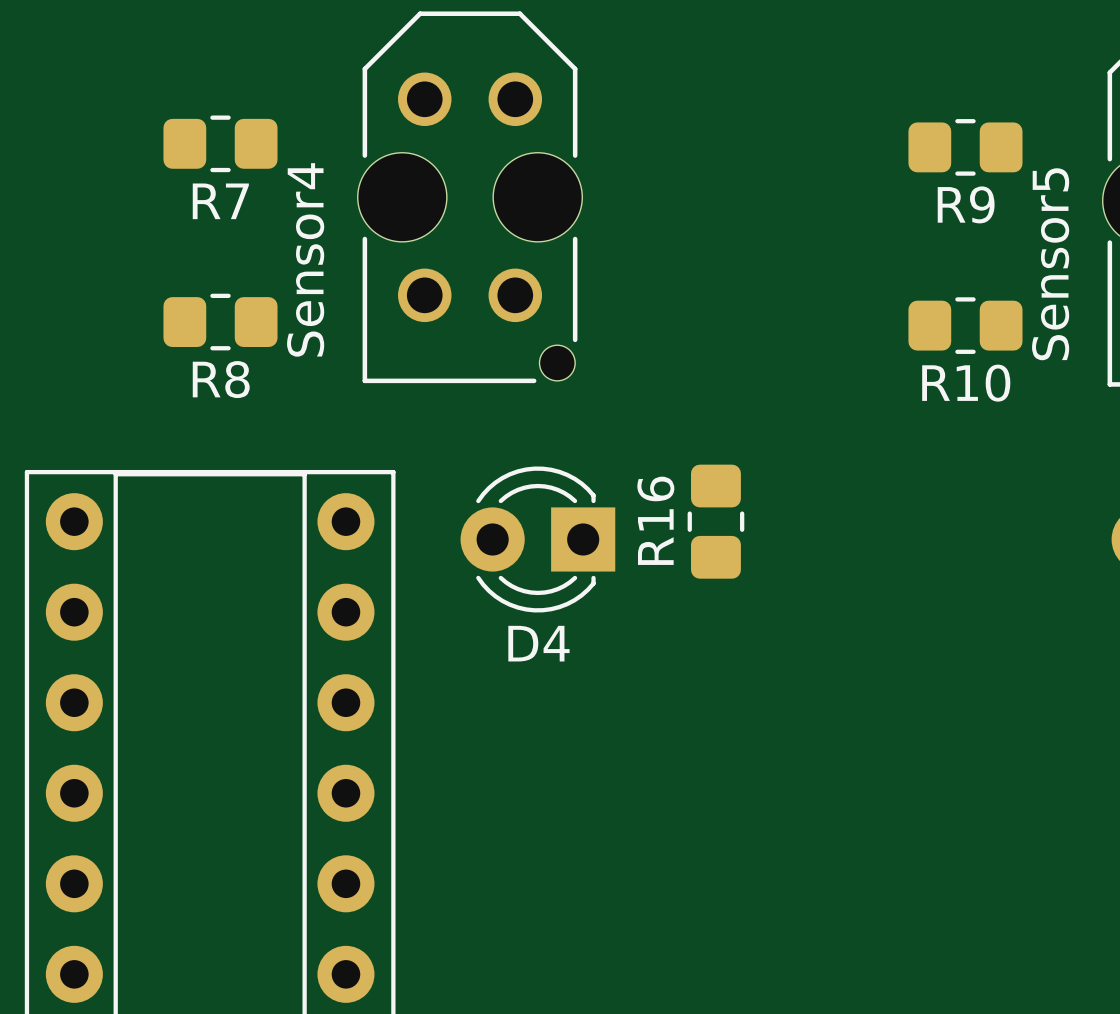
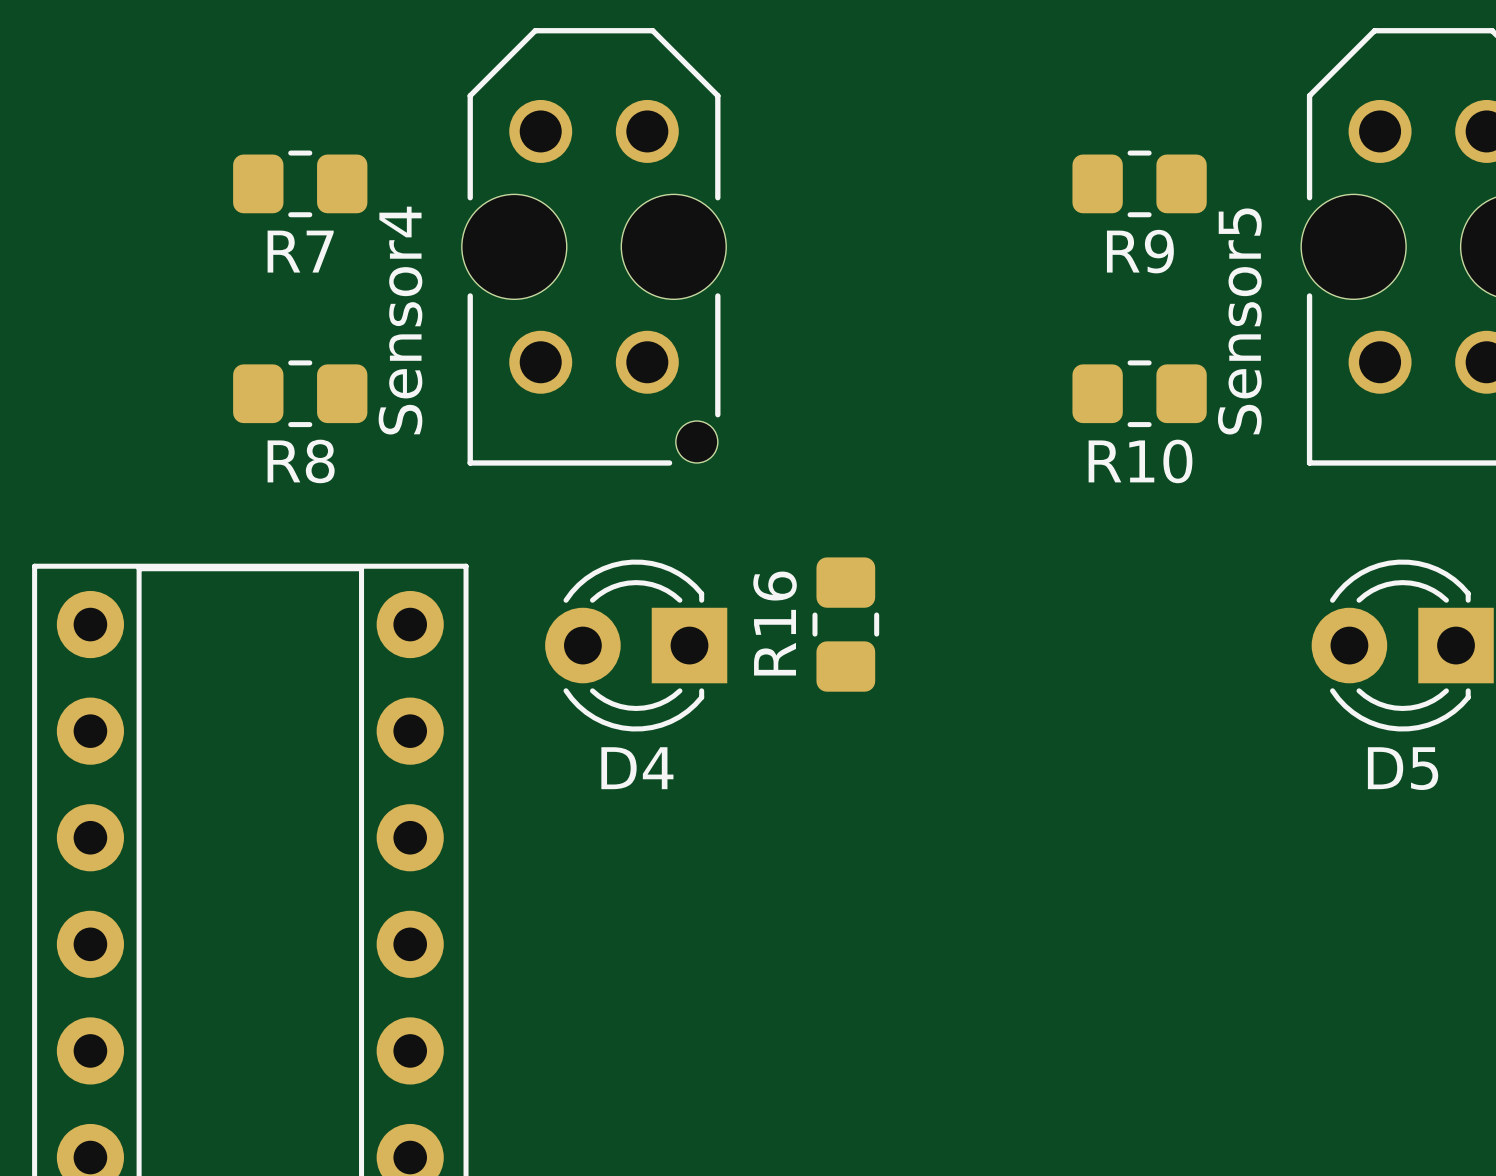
R7 position: (220, 143) -> (300, 183)
Sensor4 position: (470, 197) -> (594, 246)
R8 position: (220, 322) -> (300, 393)

